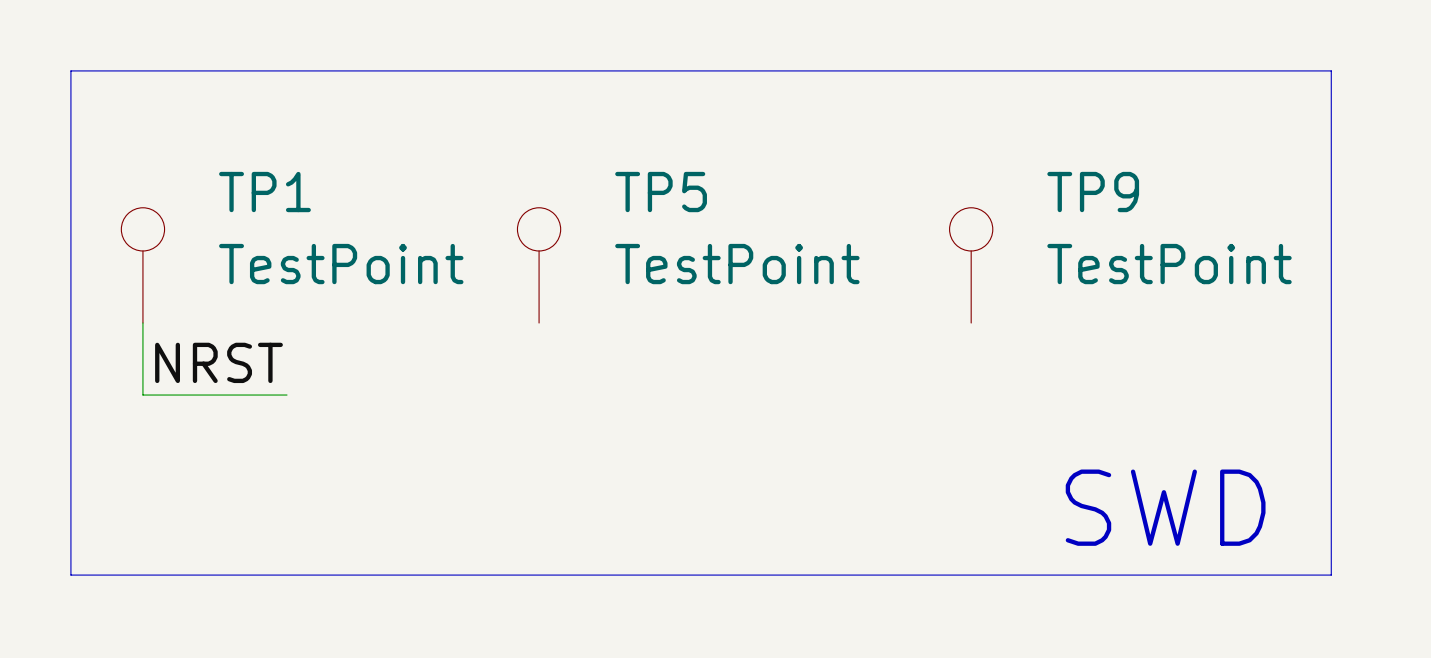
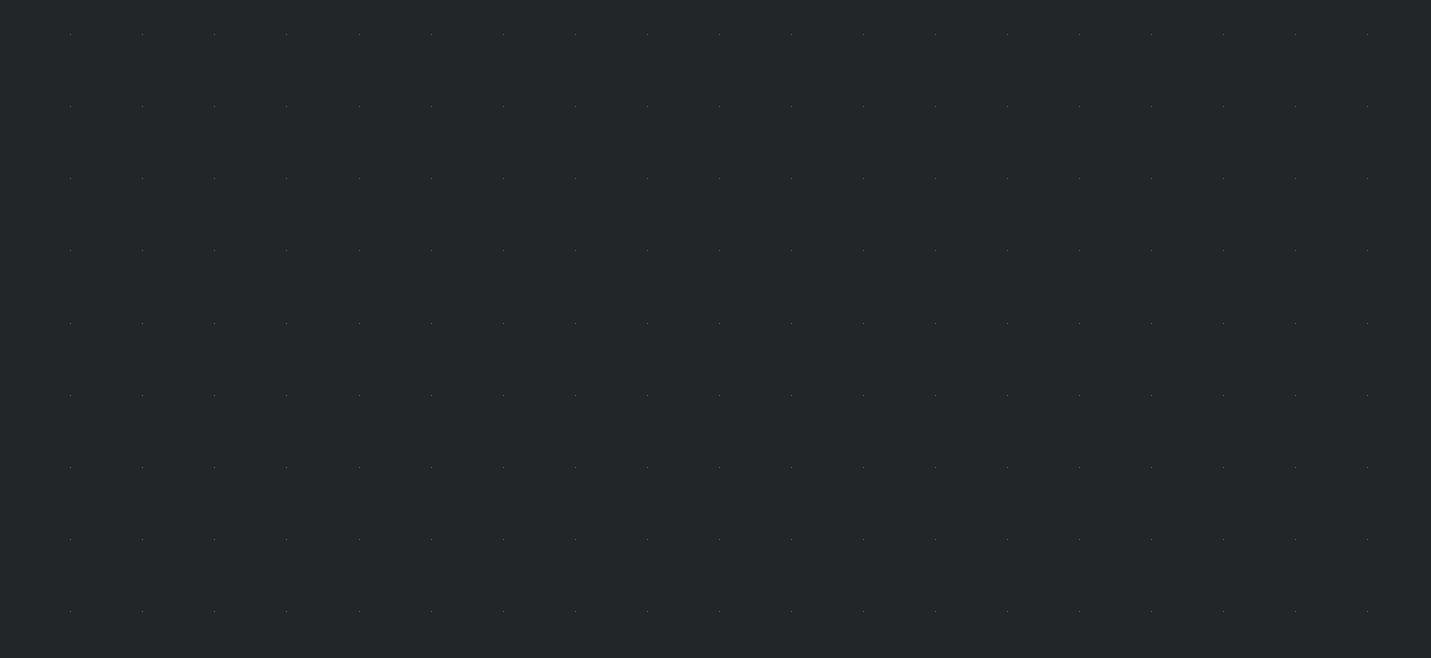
line: (70, 70) (1331, 70) (1331, 575) (70, 575) (70, 70) -> none
TP1: TestPoint (142, 265) -> none
TP5: TestPoint (539, 265) -> none
TP9: TestPoint (971, 265) -> none
wire: (142, 323) (142, 395) (286, 395) -> none
label: NRST (218, 362) -> none
text: SWD (1165, 507) -> none

